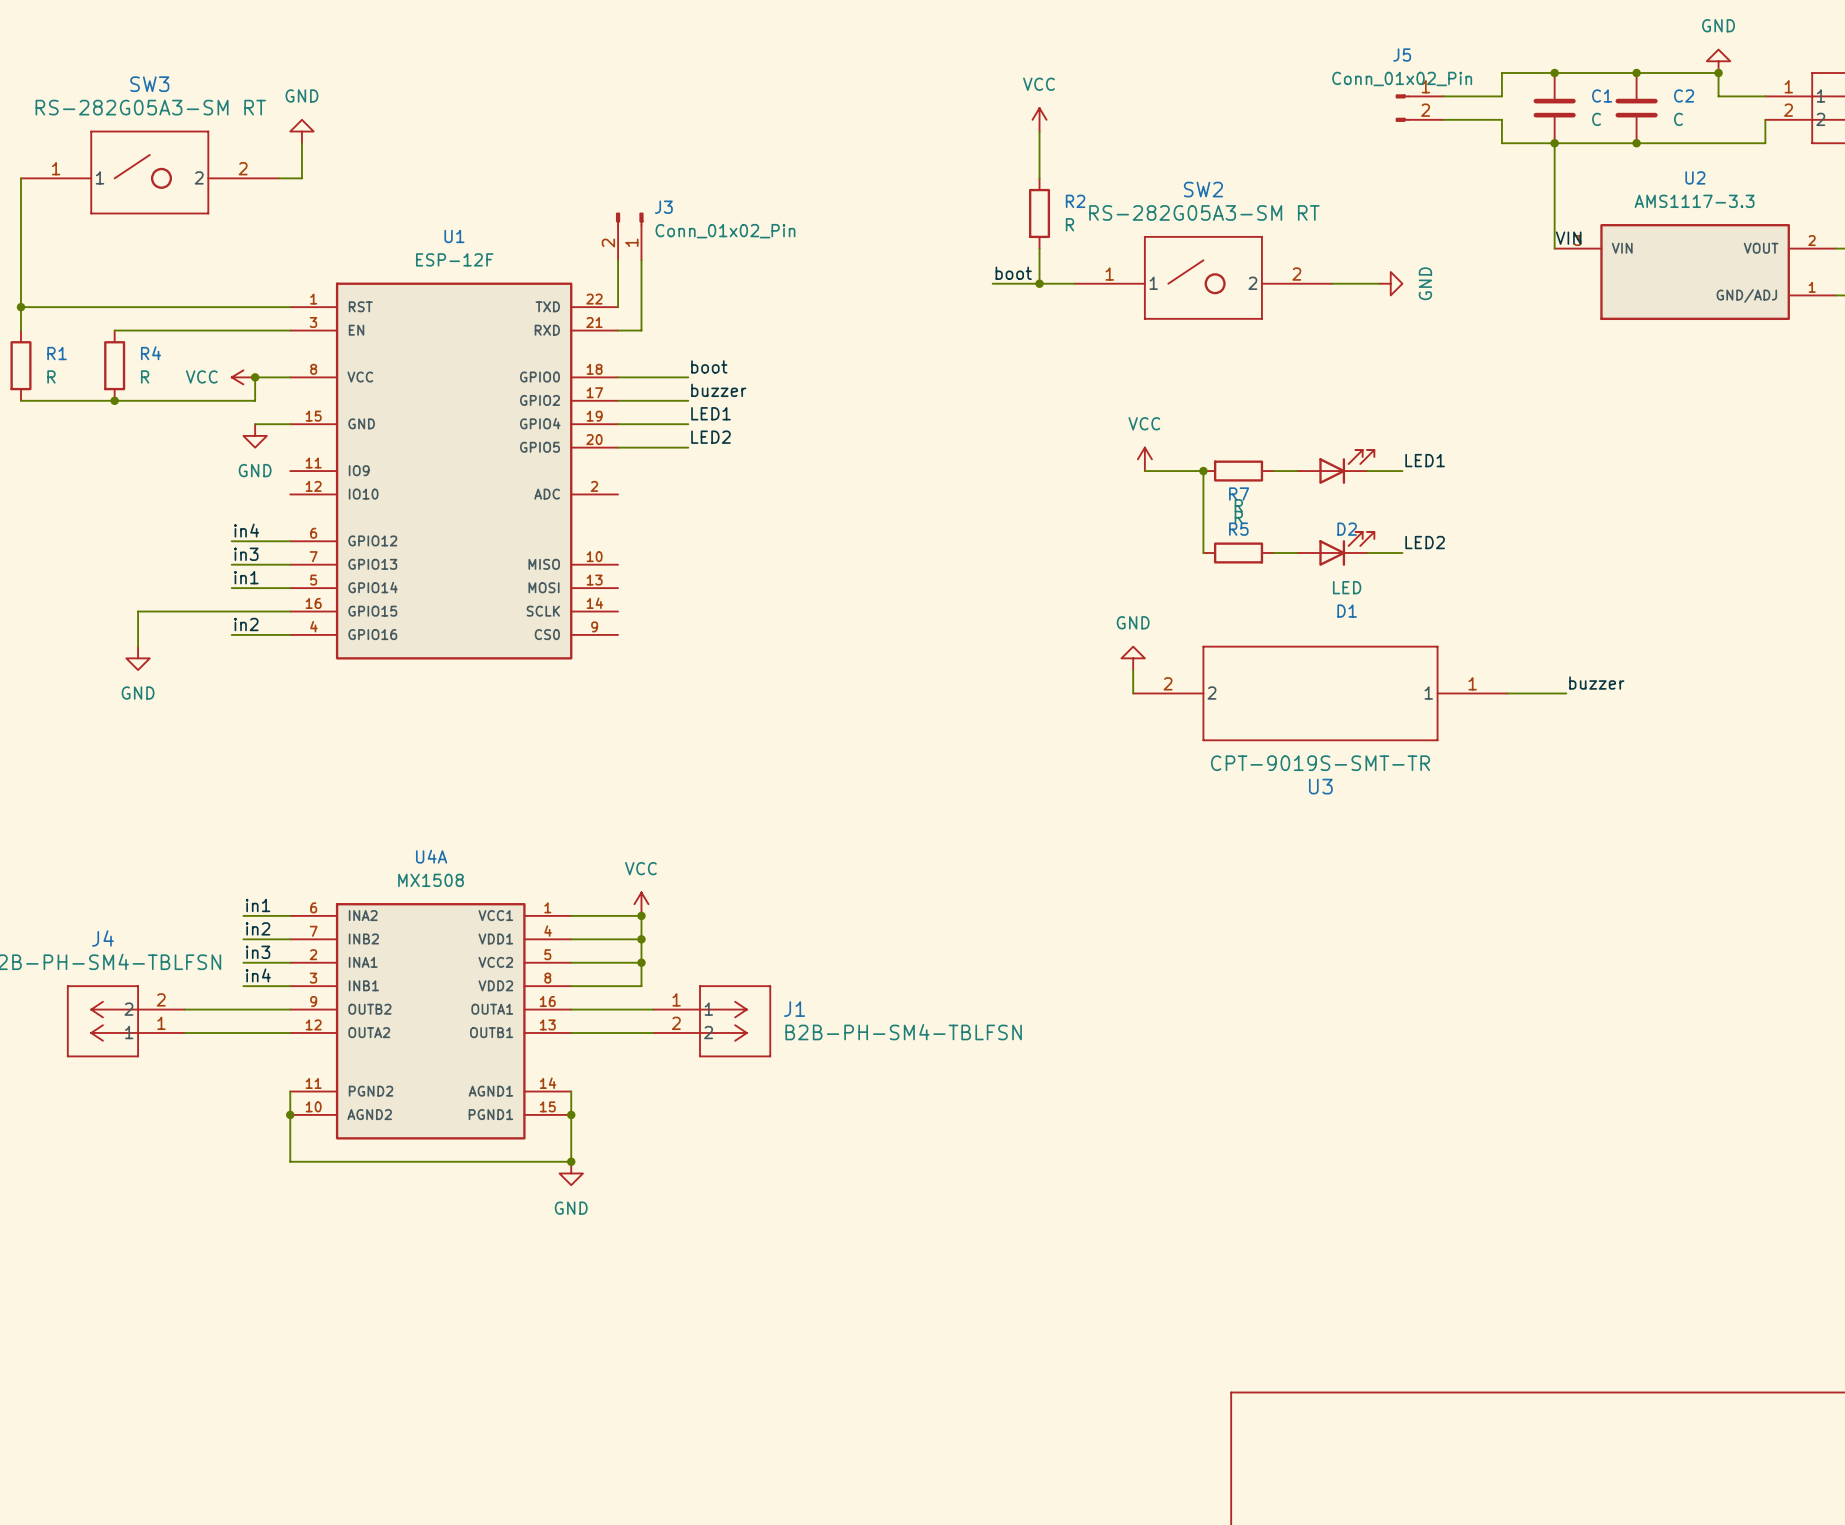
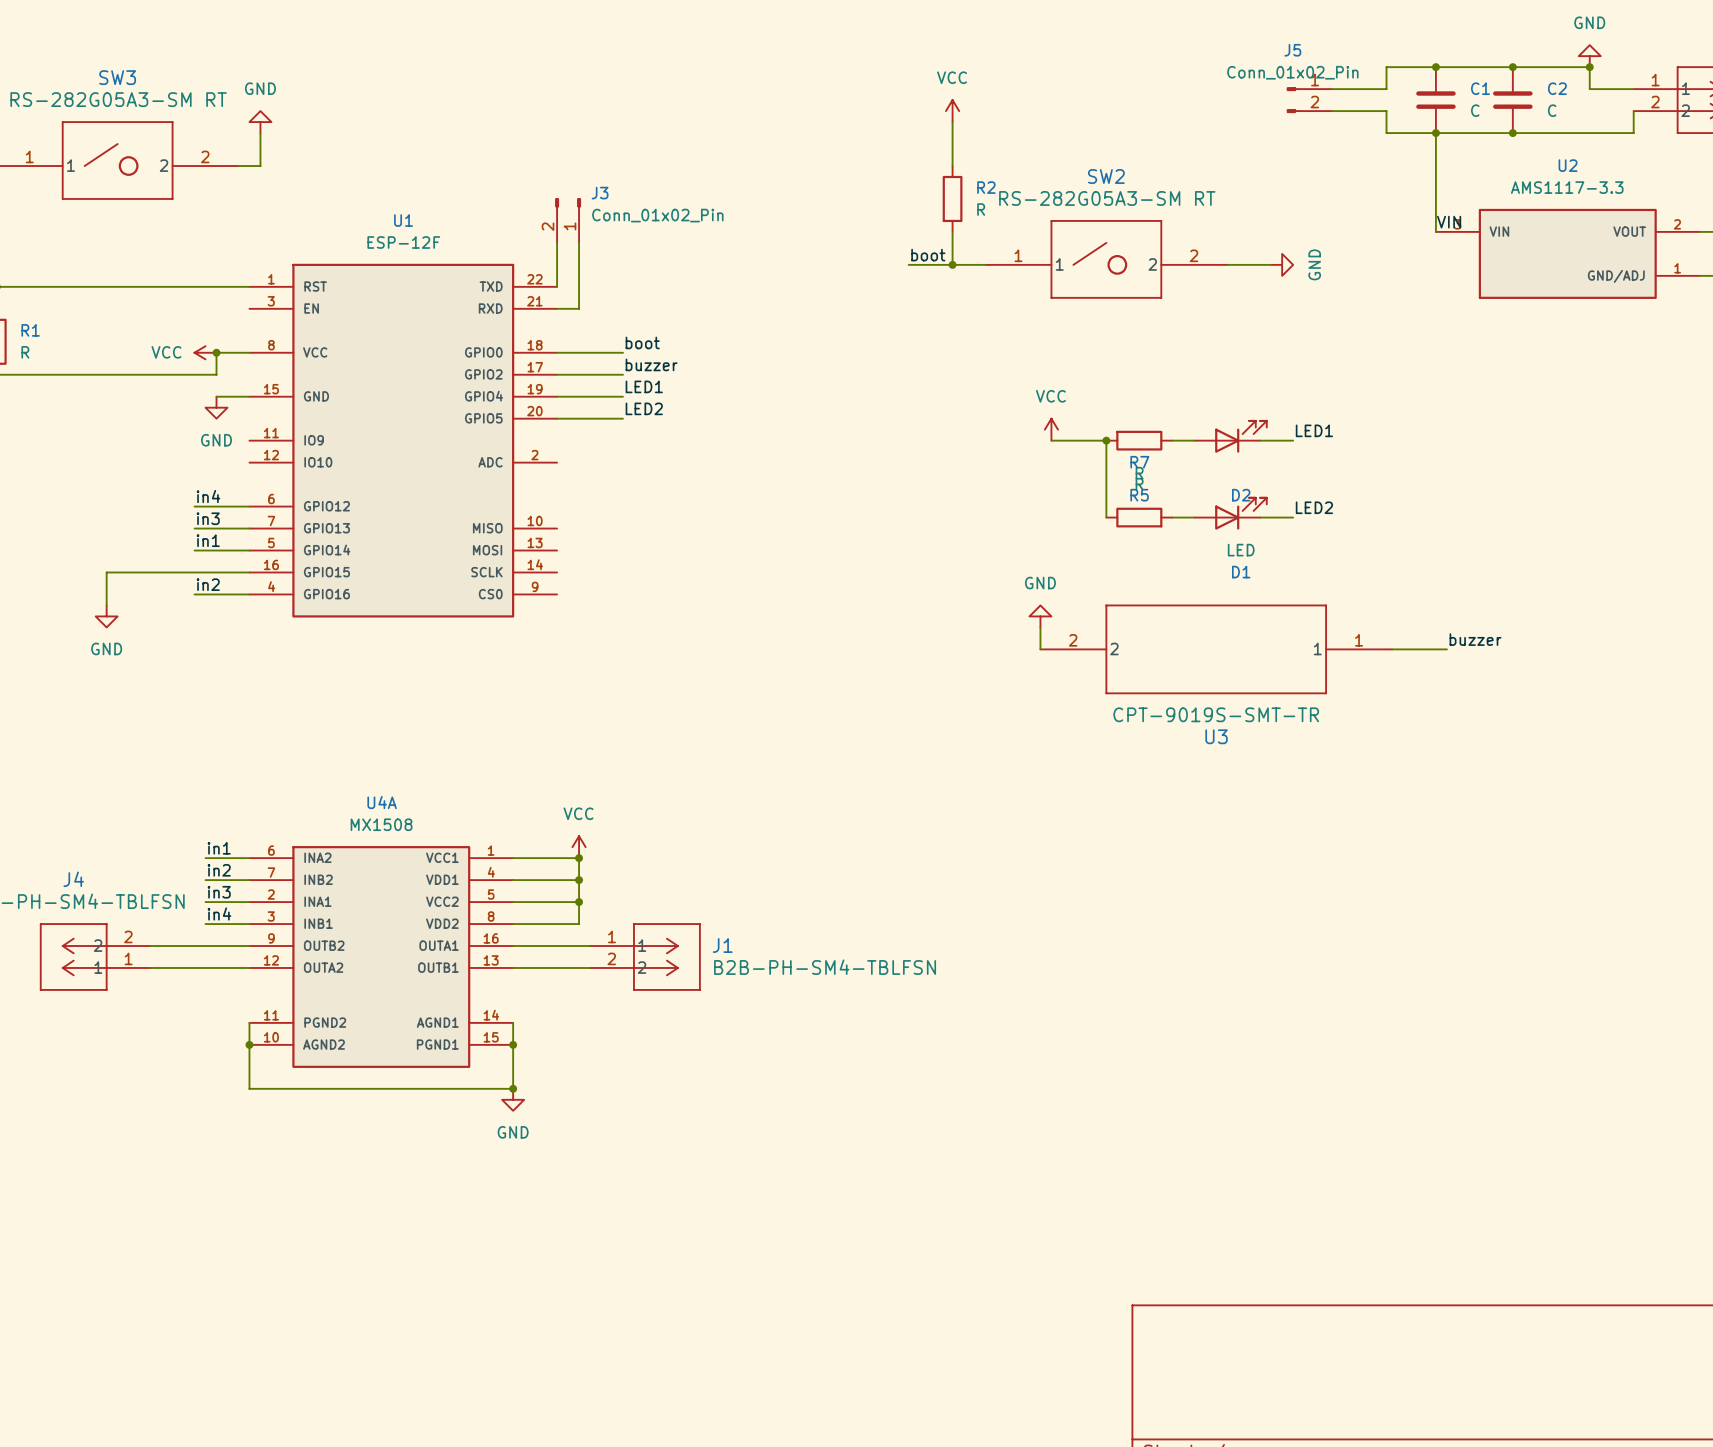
wire: (114, 330) (290, 330) -> none
R4: R (114, 365) -> none
junction: (114, 400) -> none

